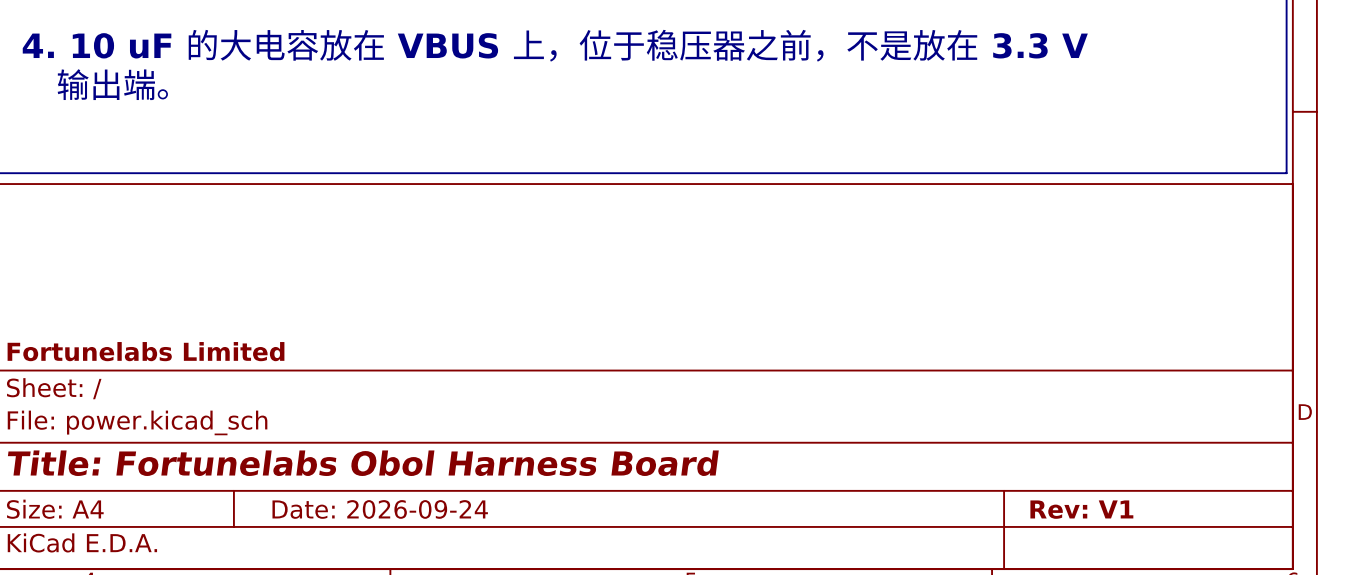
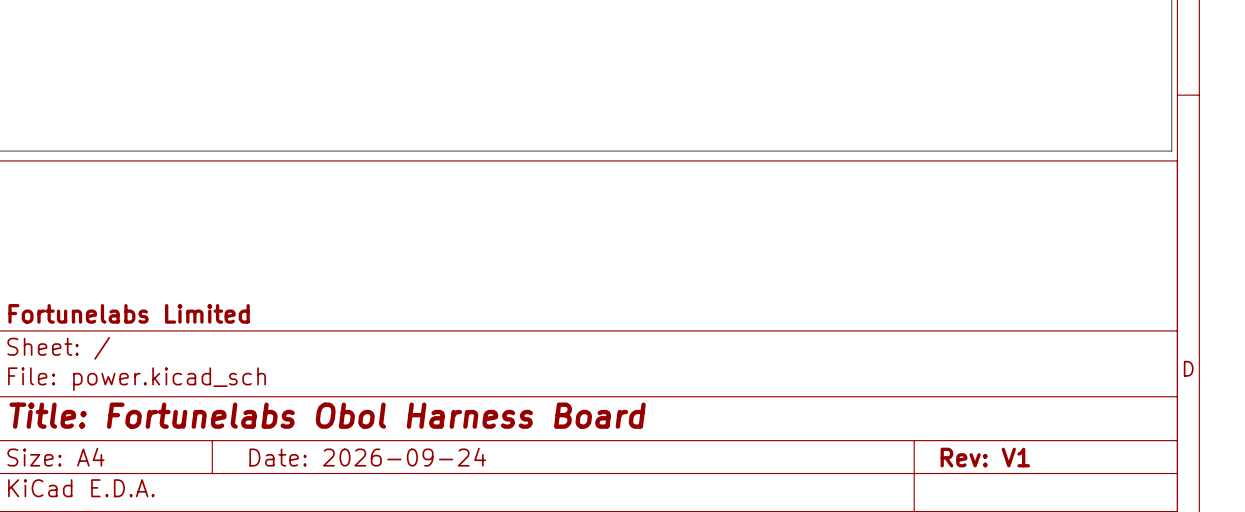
text: 4. 10 uF 的大电容放在 VBUS 上，位于稳压器之前，不是放在 3.3 V (555, 45) -> none
text: 输出端。 (112, 84) -> none

